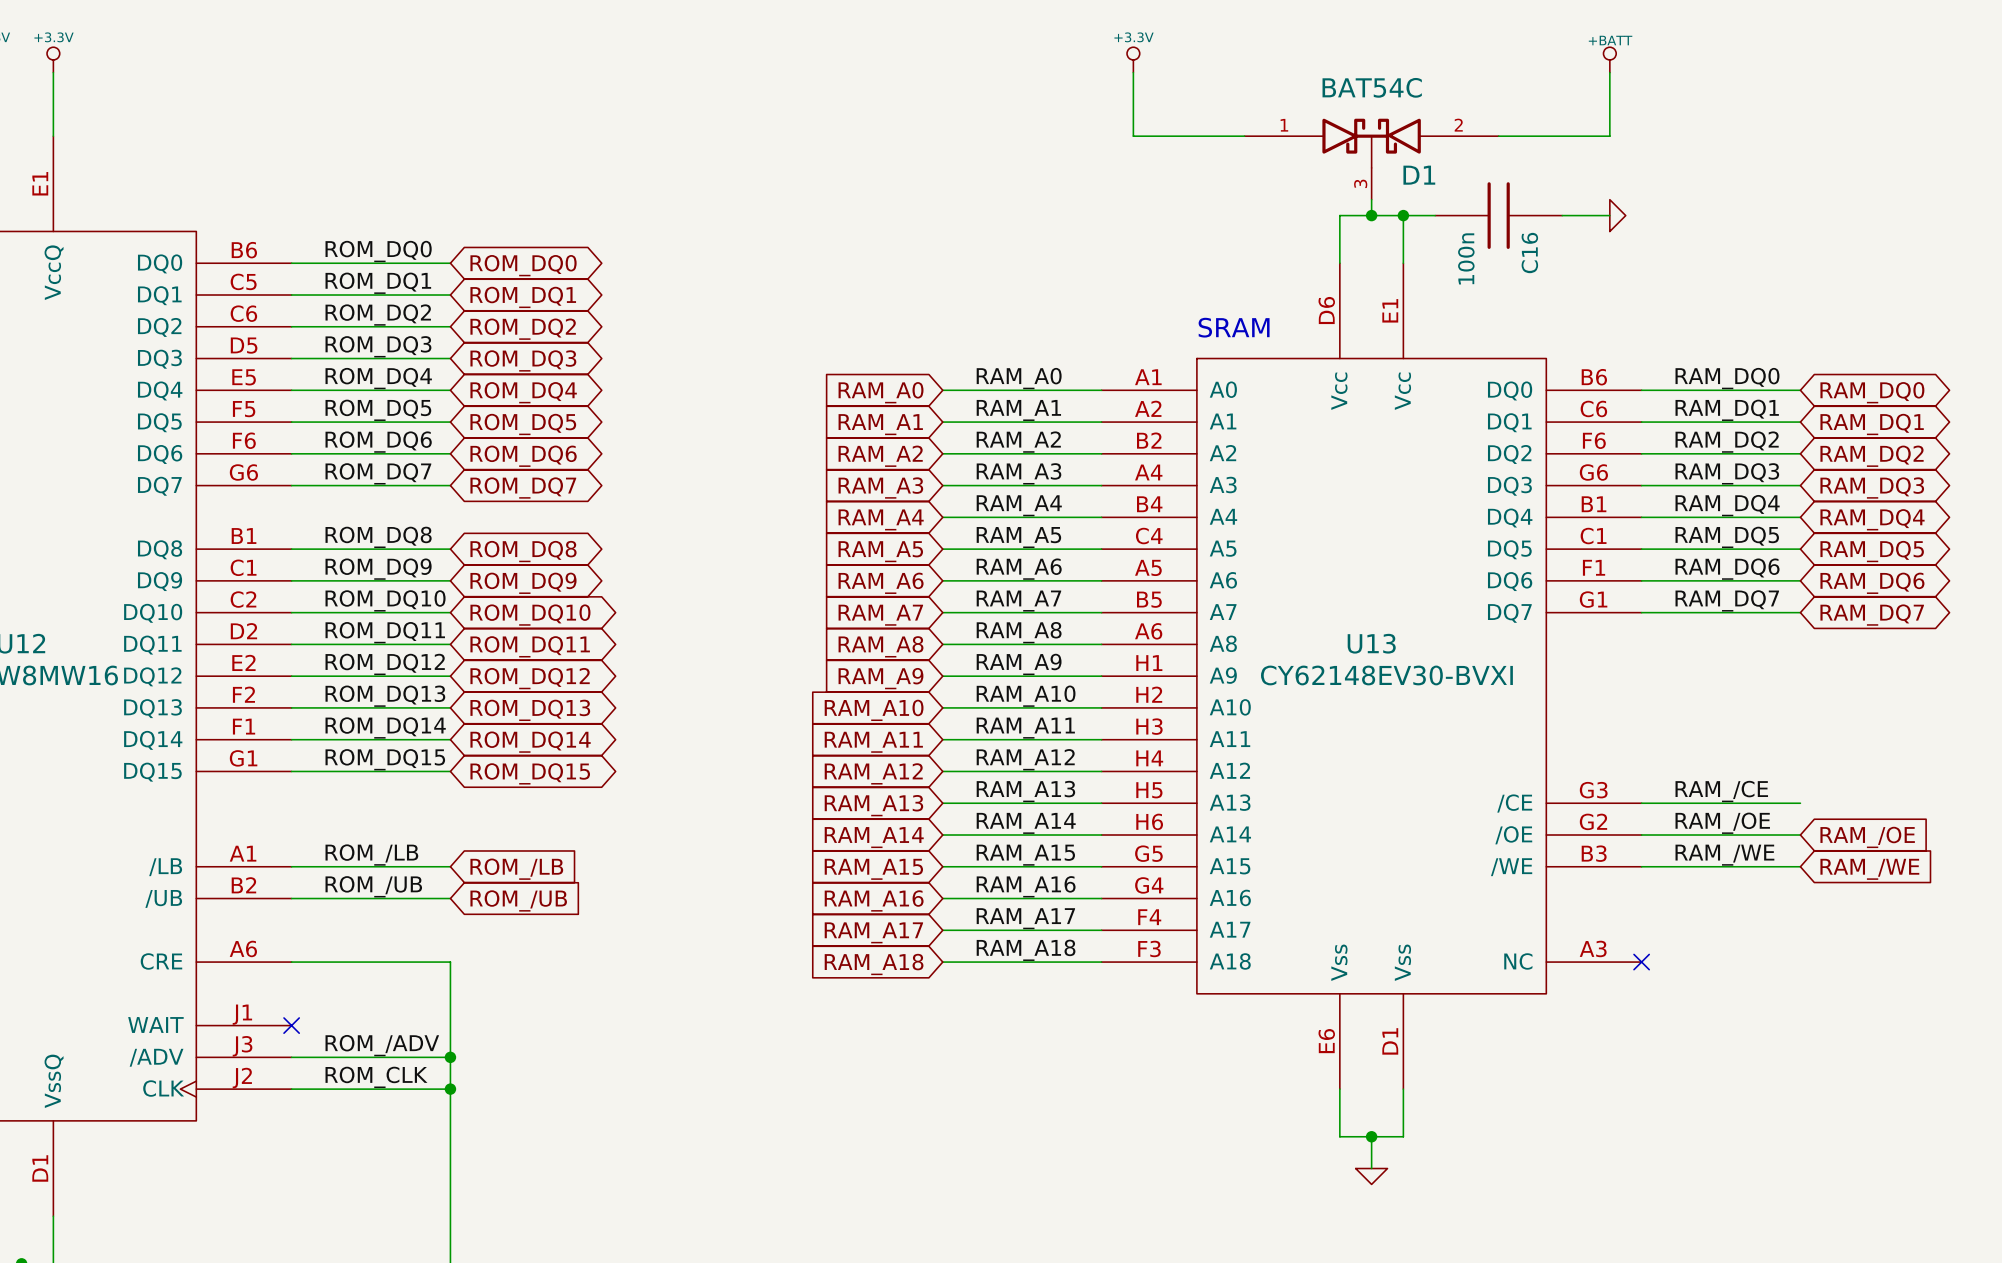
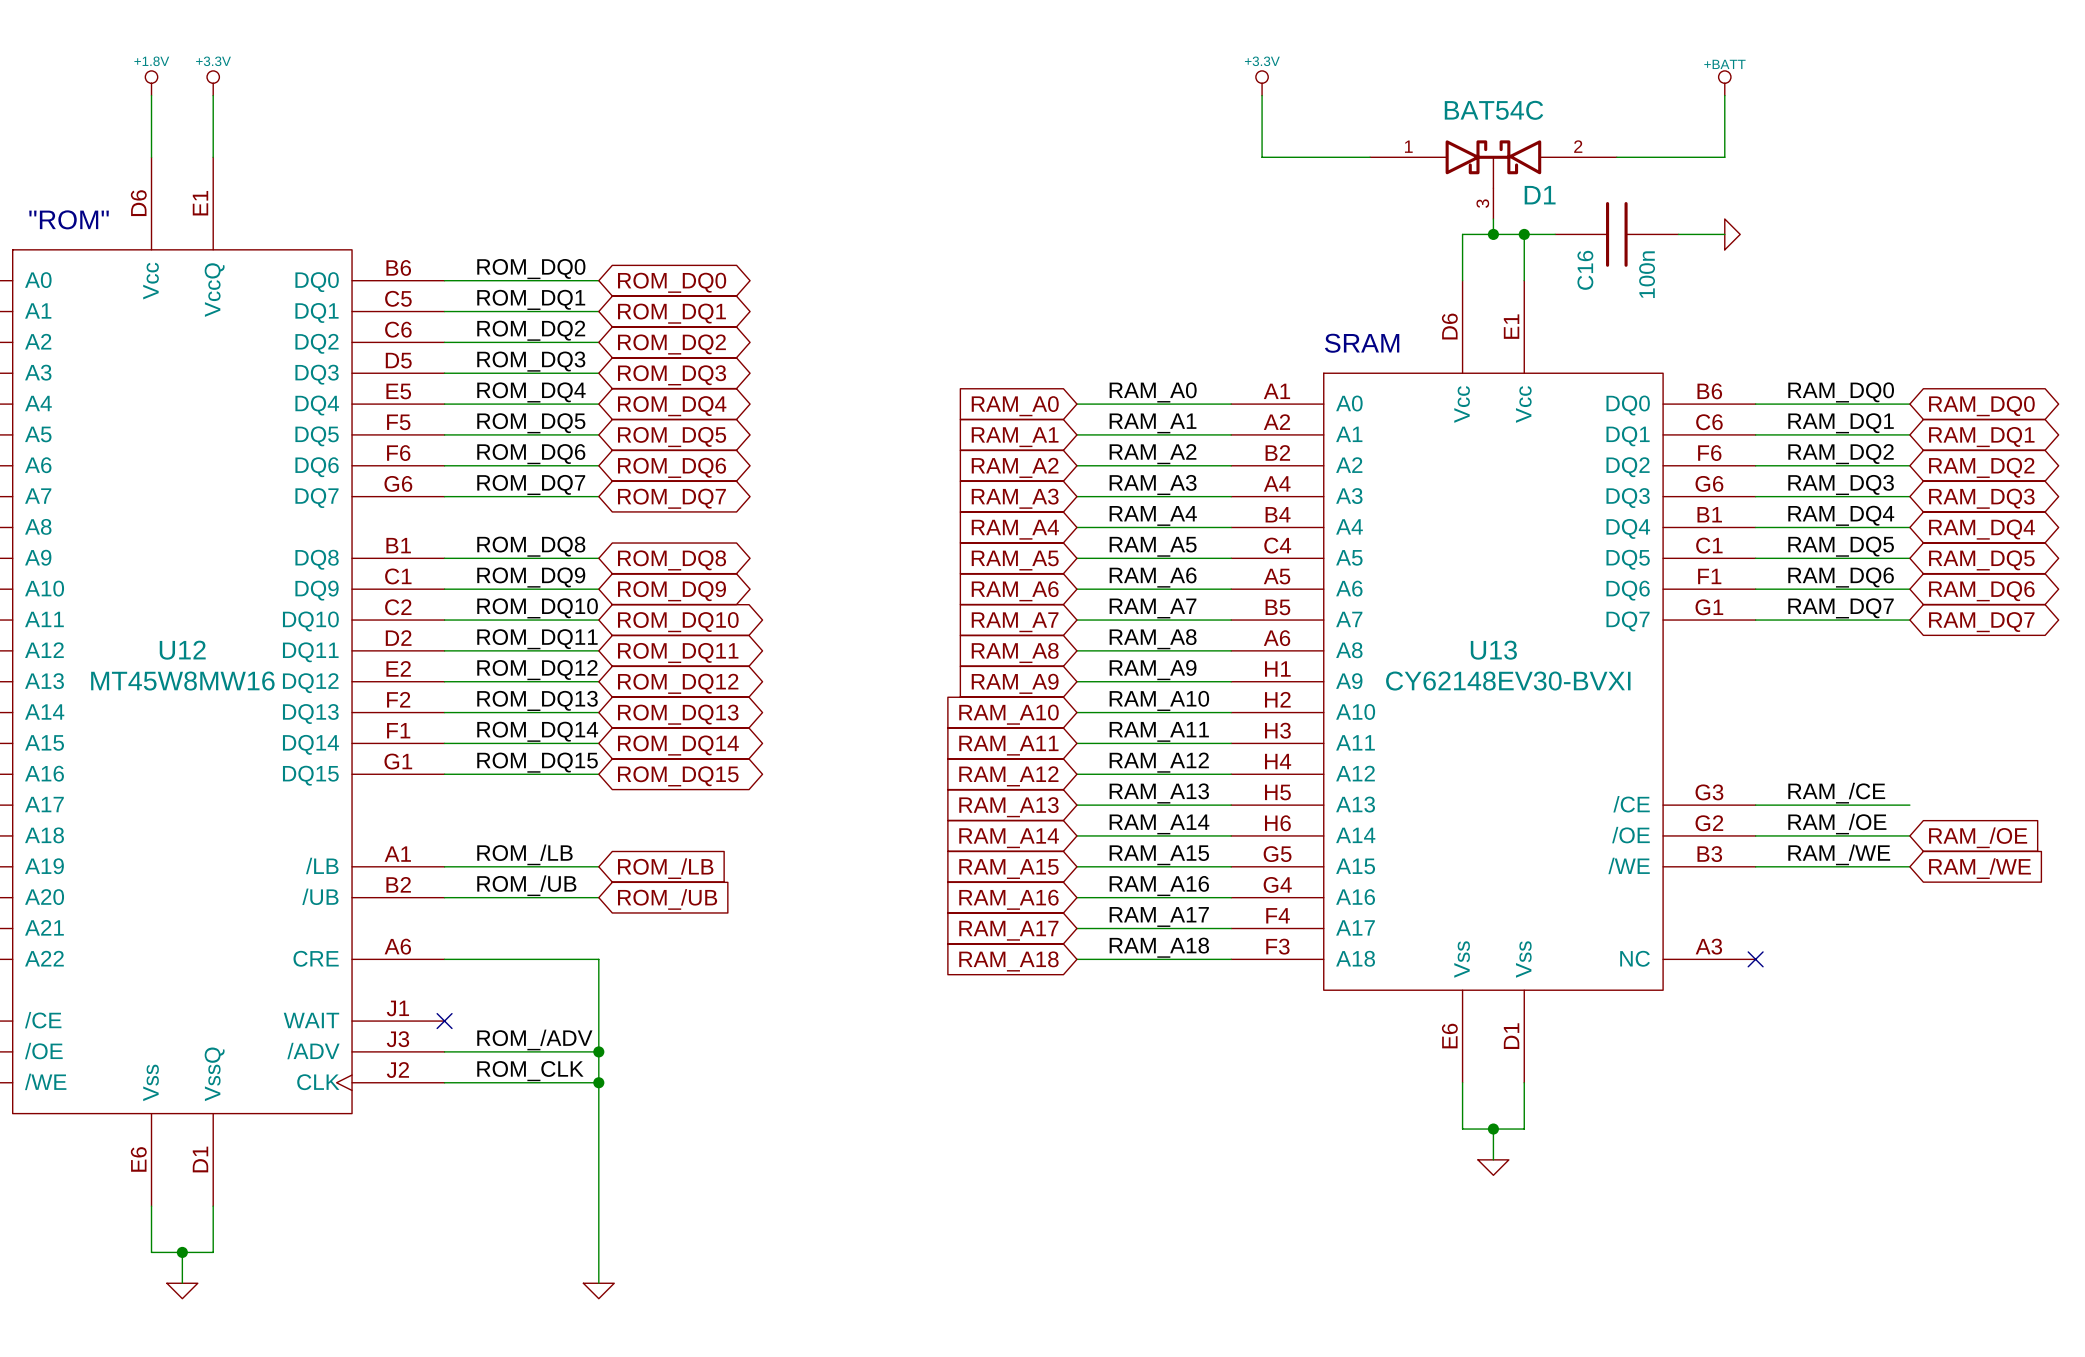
C16 name position: C16 (1529, 253) -> C16 (1585, 270)
C16 value position: 100n (1466, 258) -> 100n (1647, 274)

